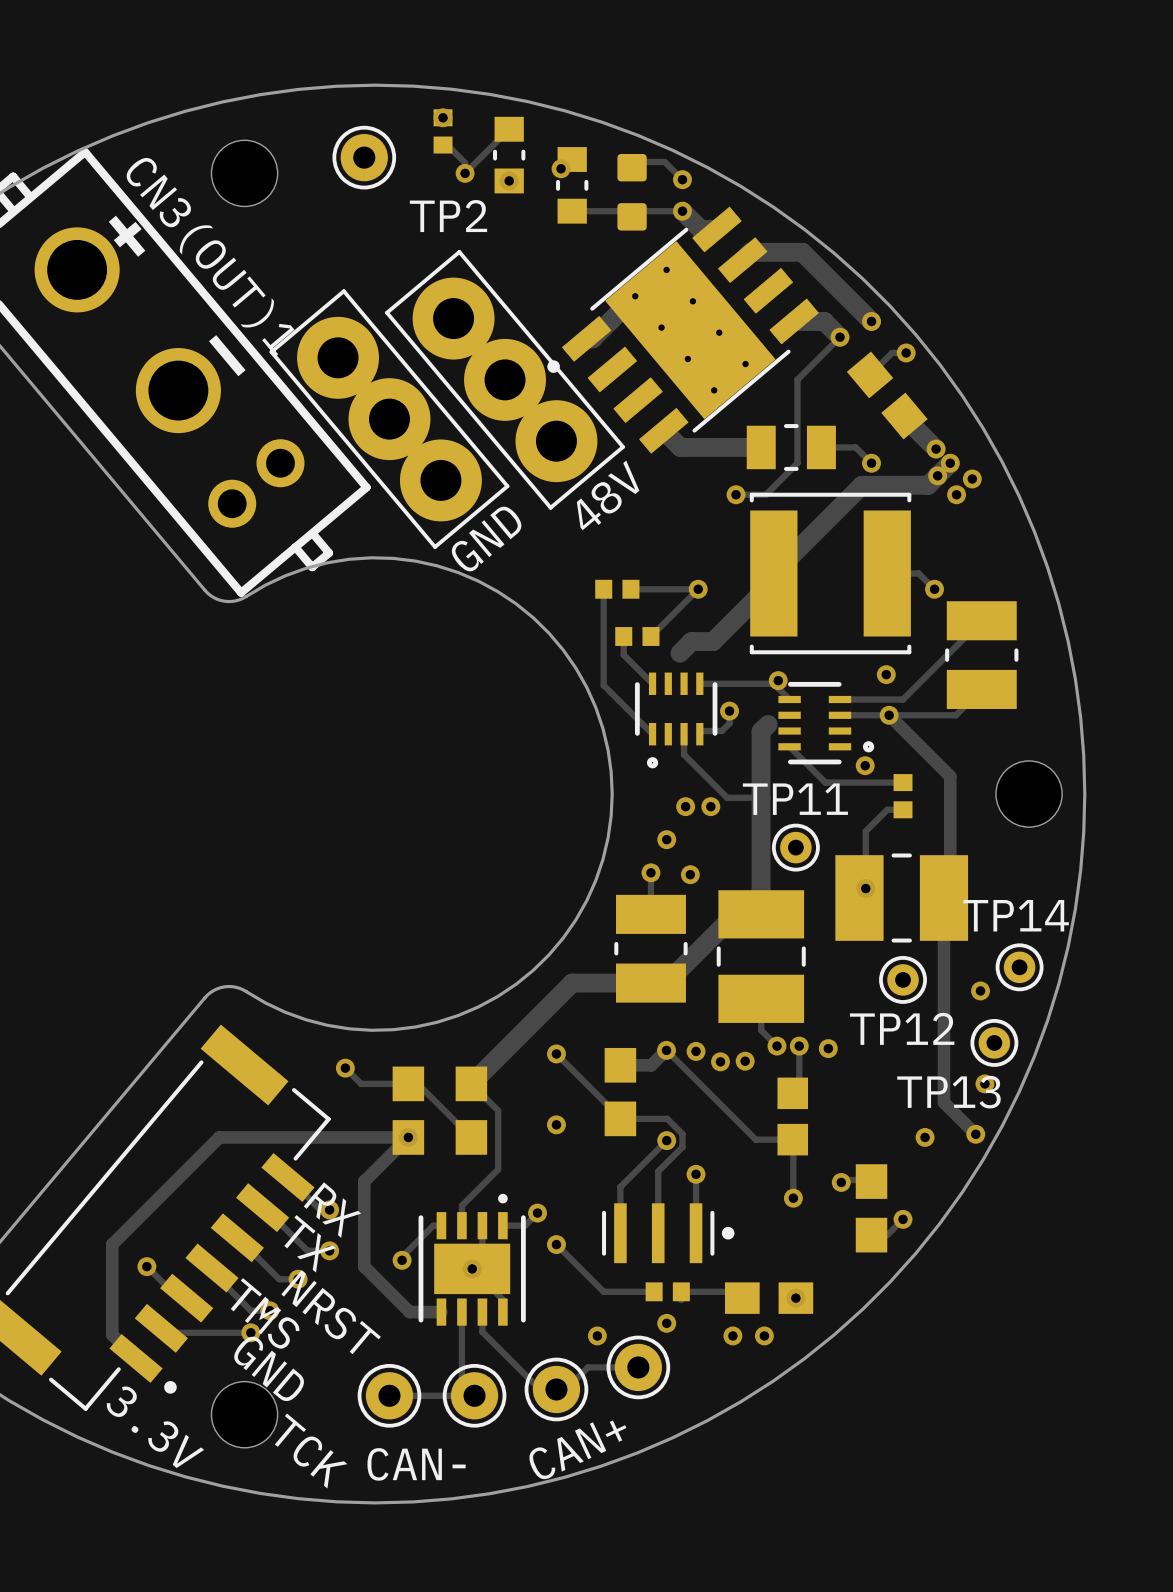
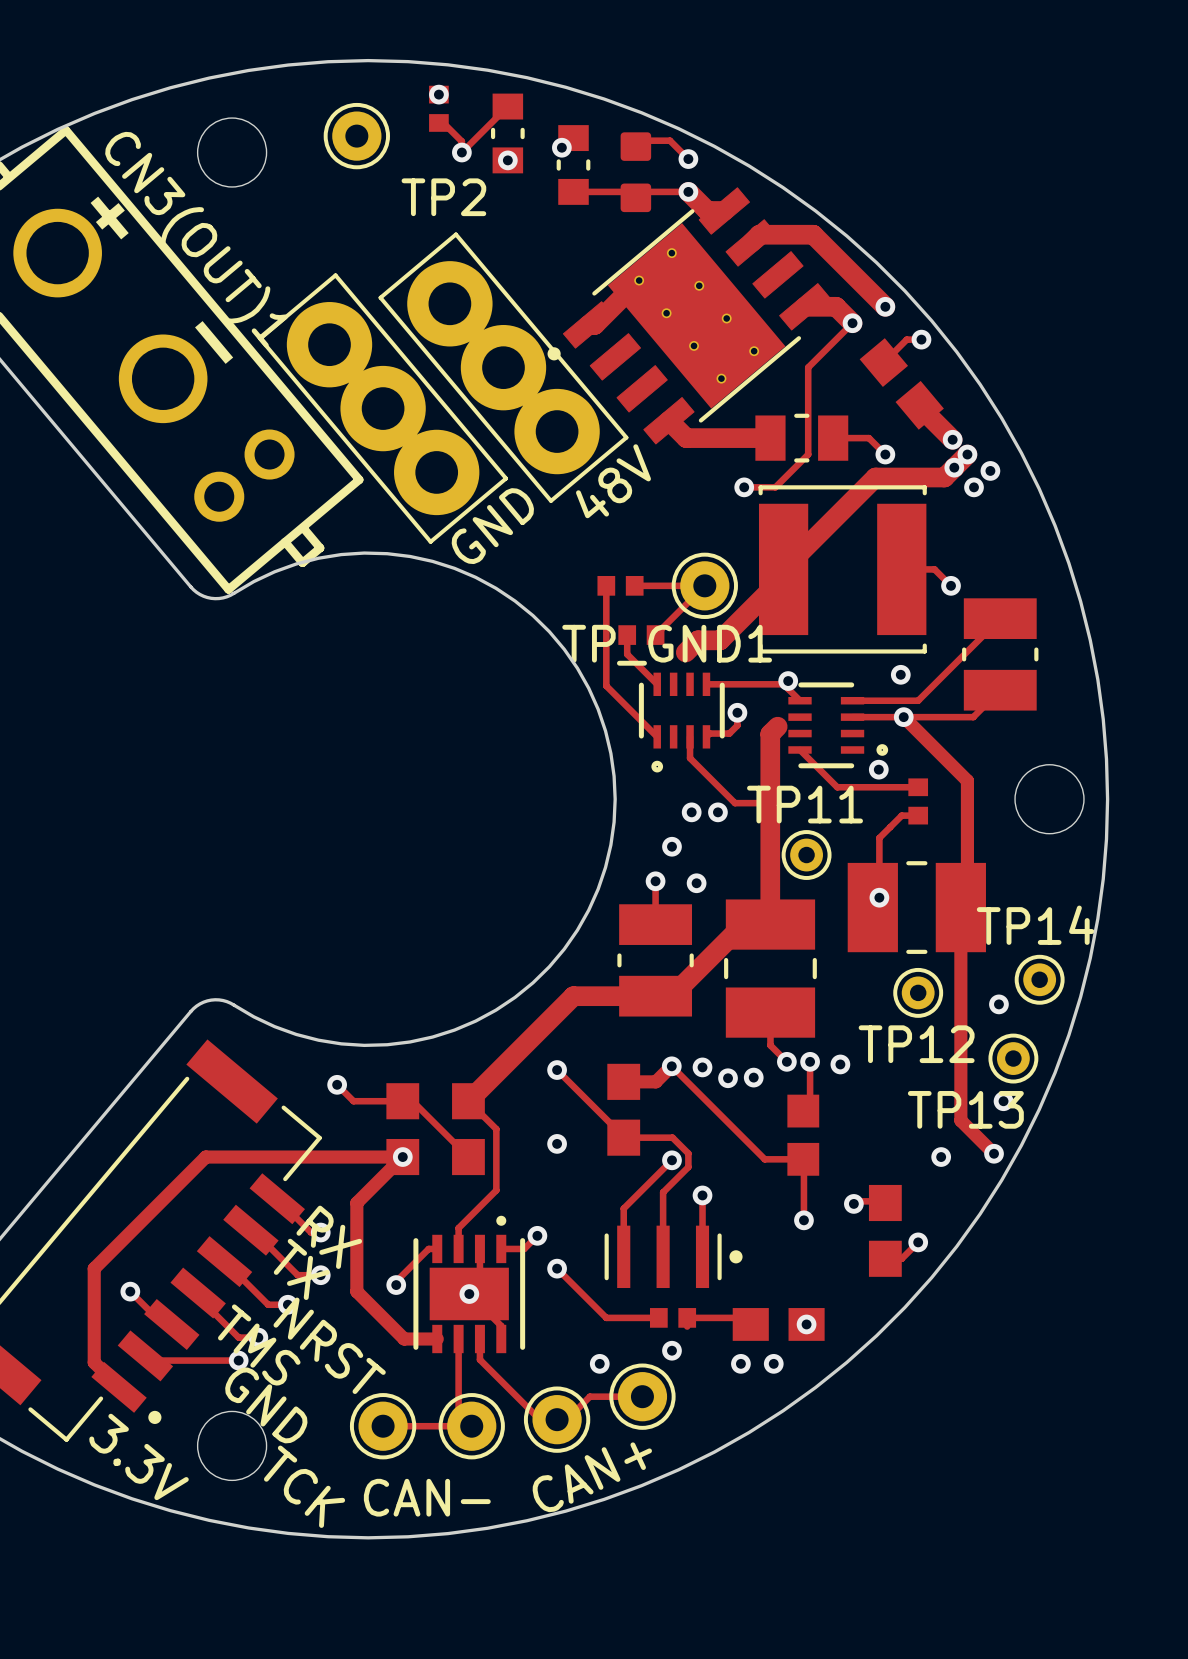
via: (698, 589) -> none
TP_GND1: none -> (704, 585)

